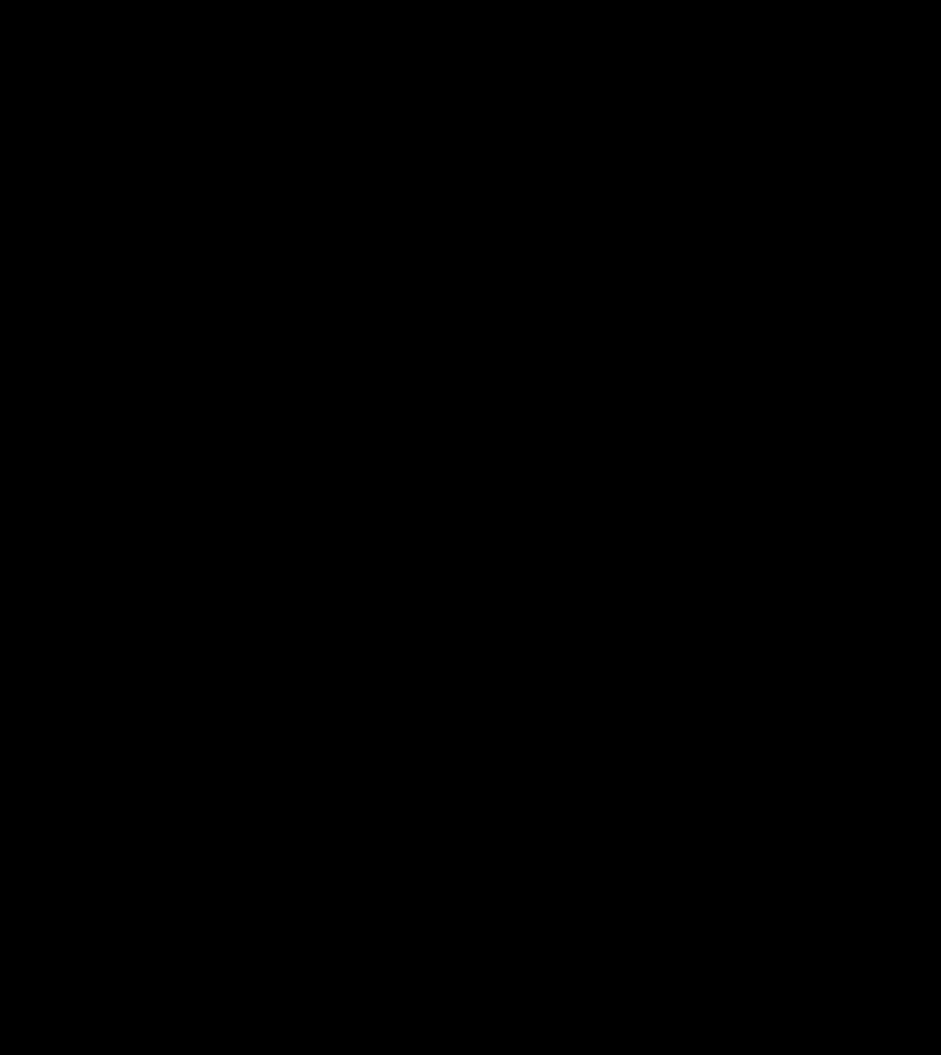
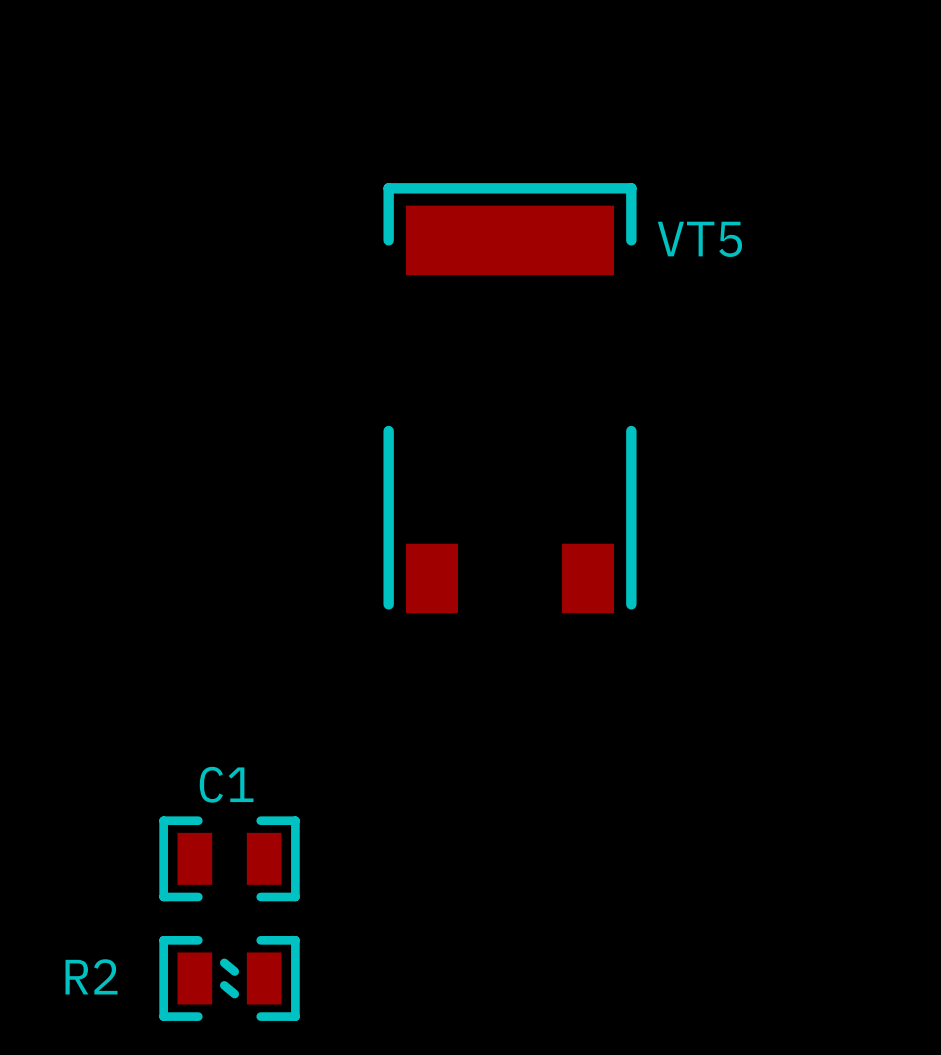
VT5: none -> (510, 398)
C1: none -> (229, 858)
R2: none -> (229, 978)

